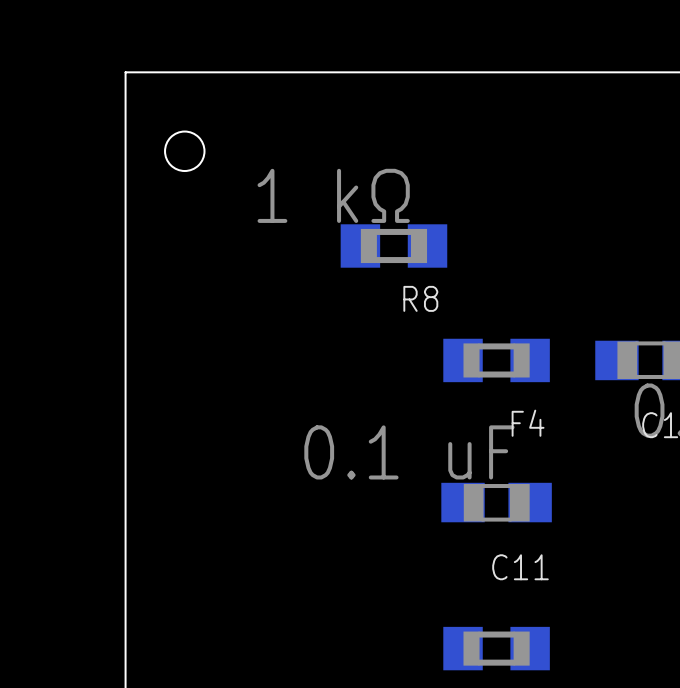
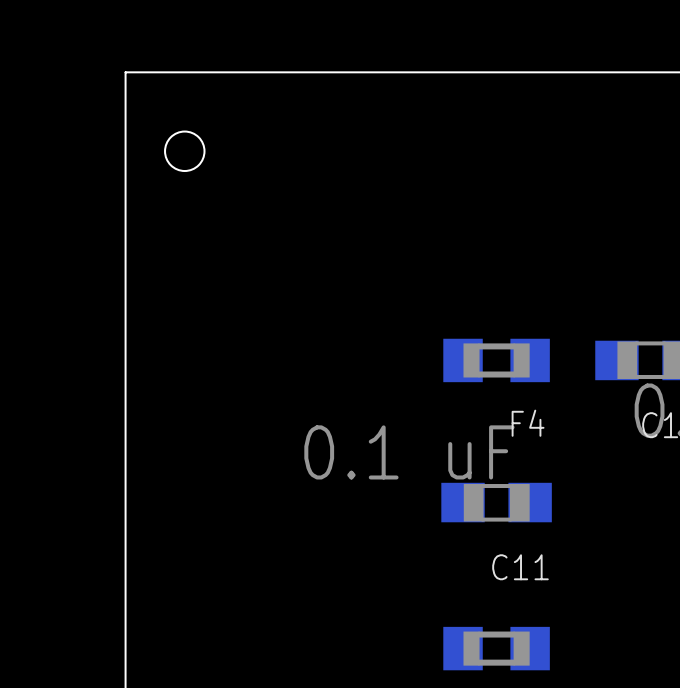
R8: 1 kΩ (393, 245) -> none

